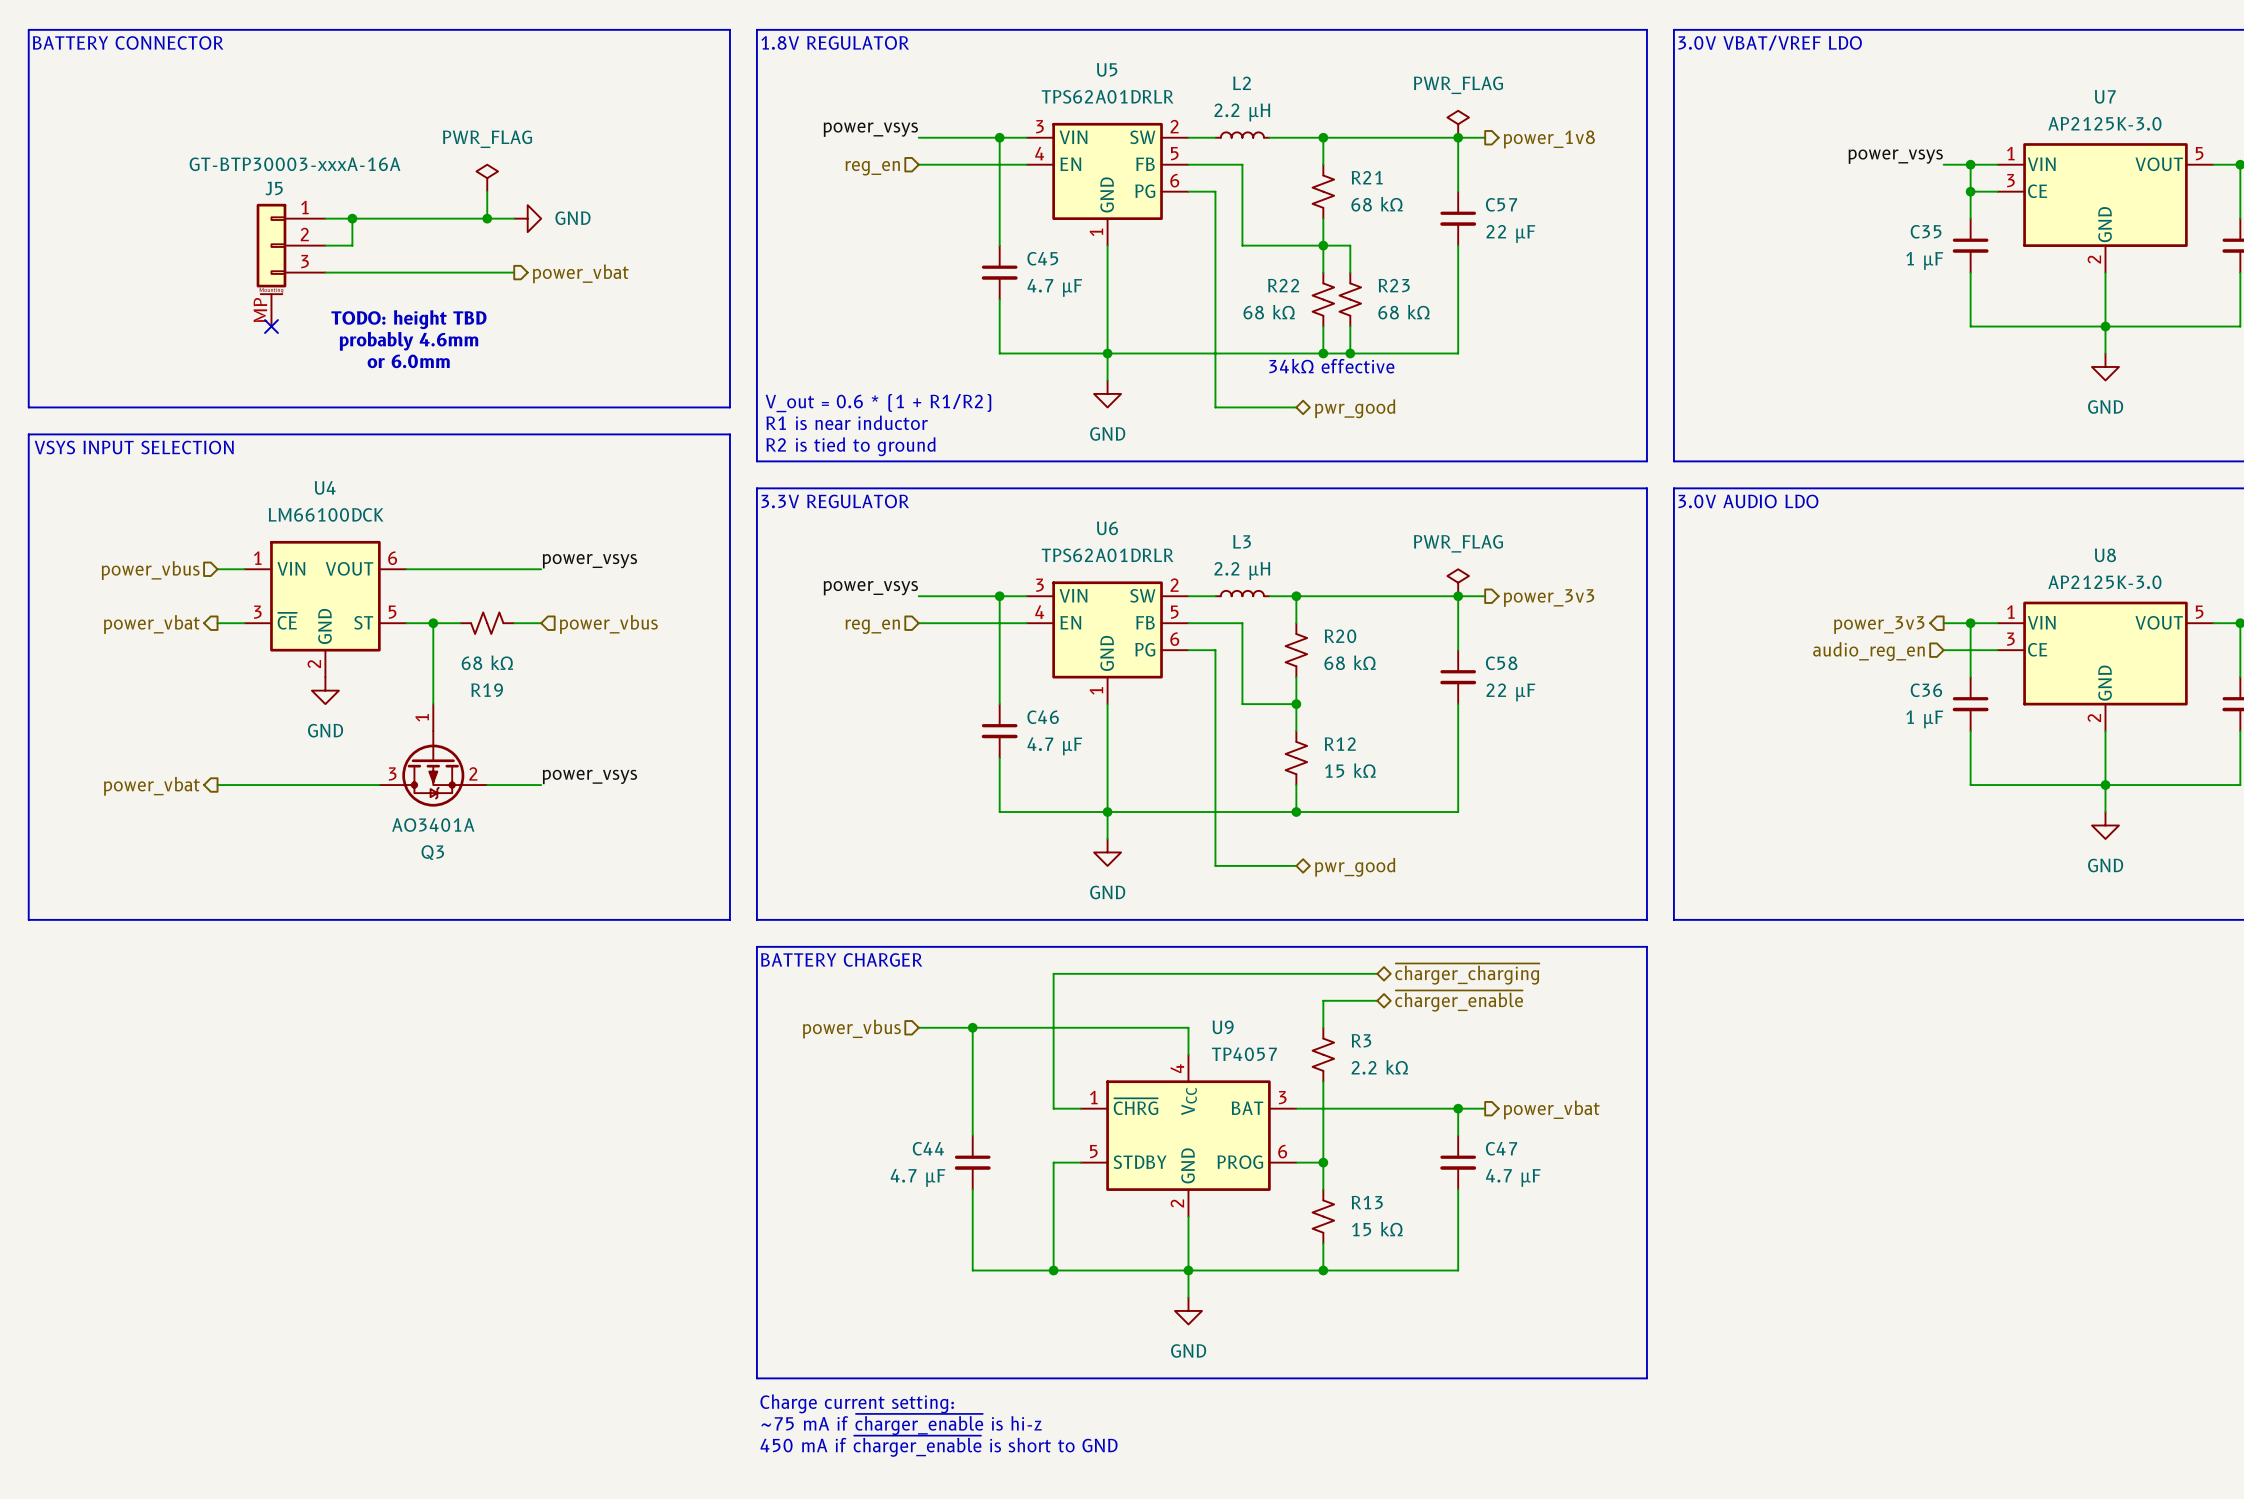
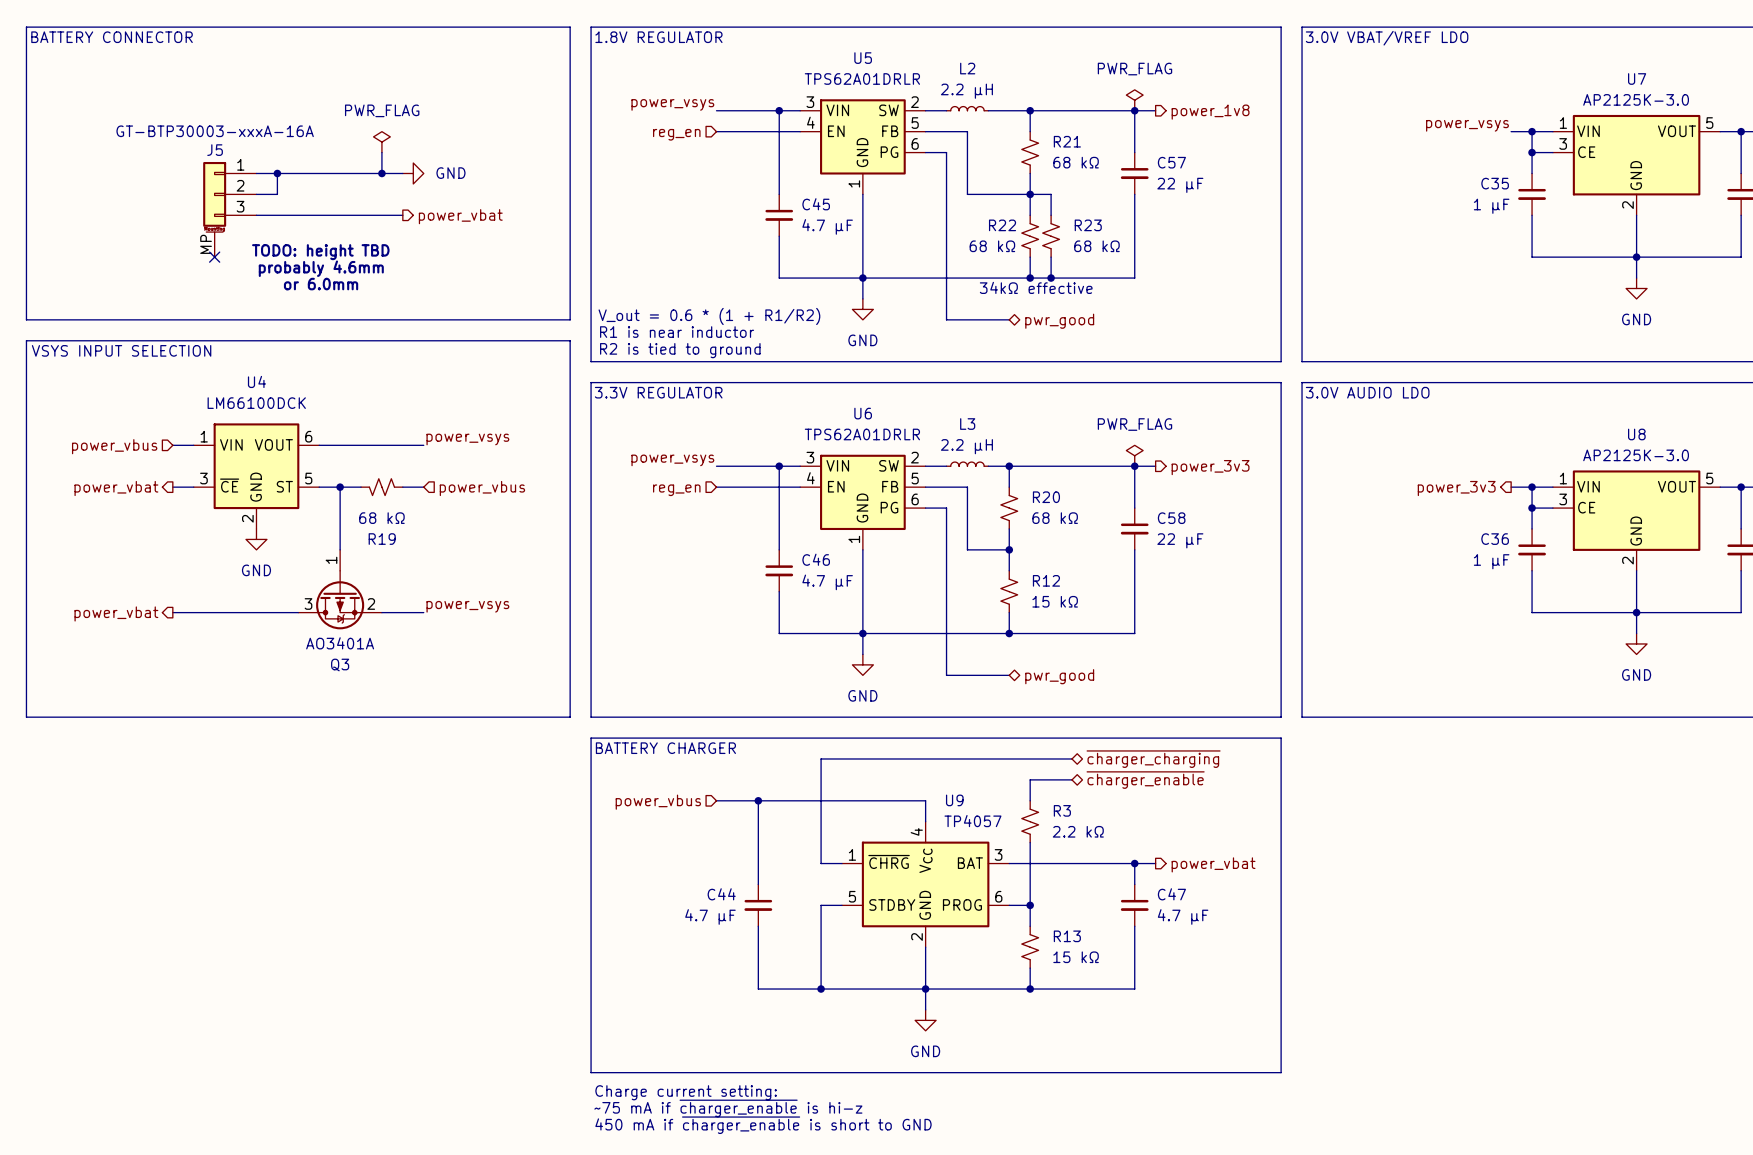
wire: (1943, 650) (1970, 650) -> none
junction: none -> (1532, 508)
hierarchical label: audio_reg_en (1868, 651) -> none

